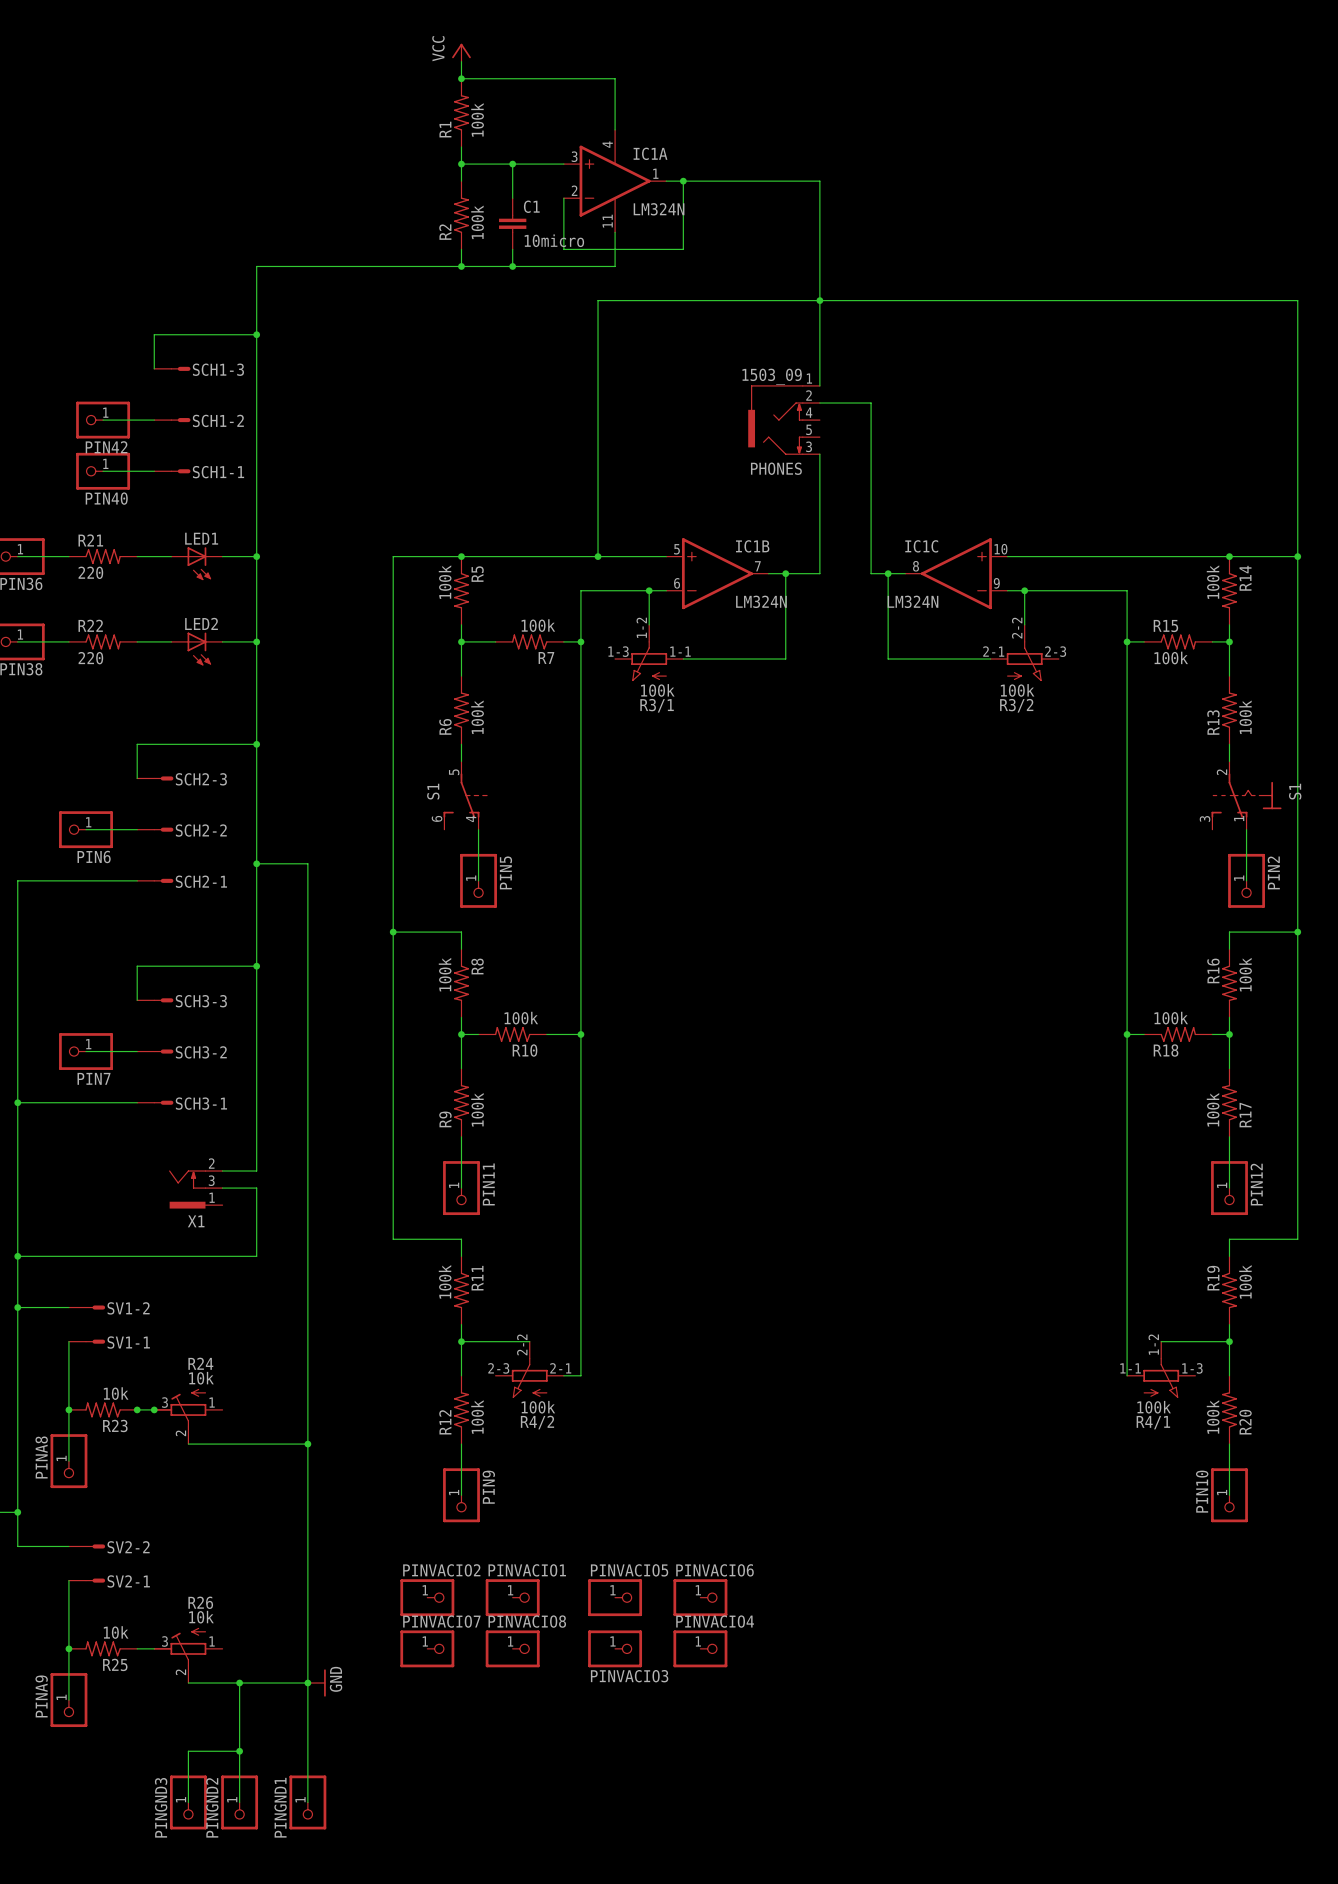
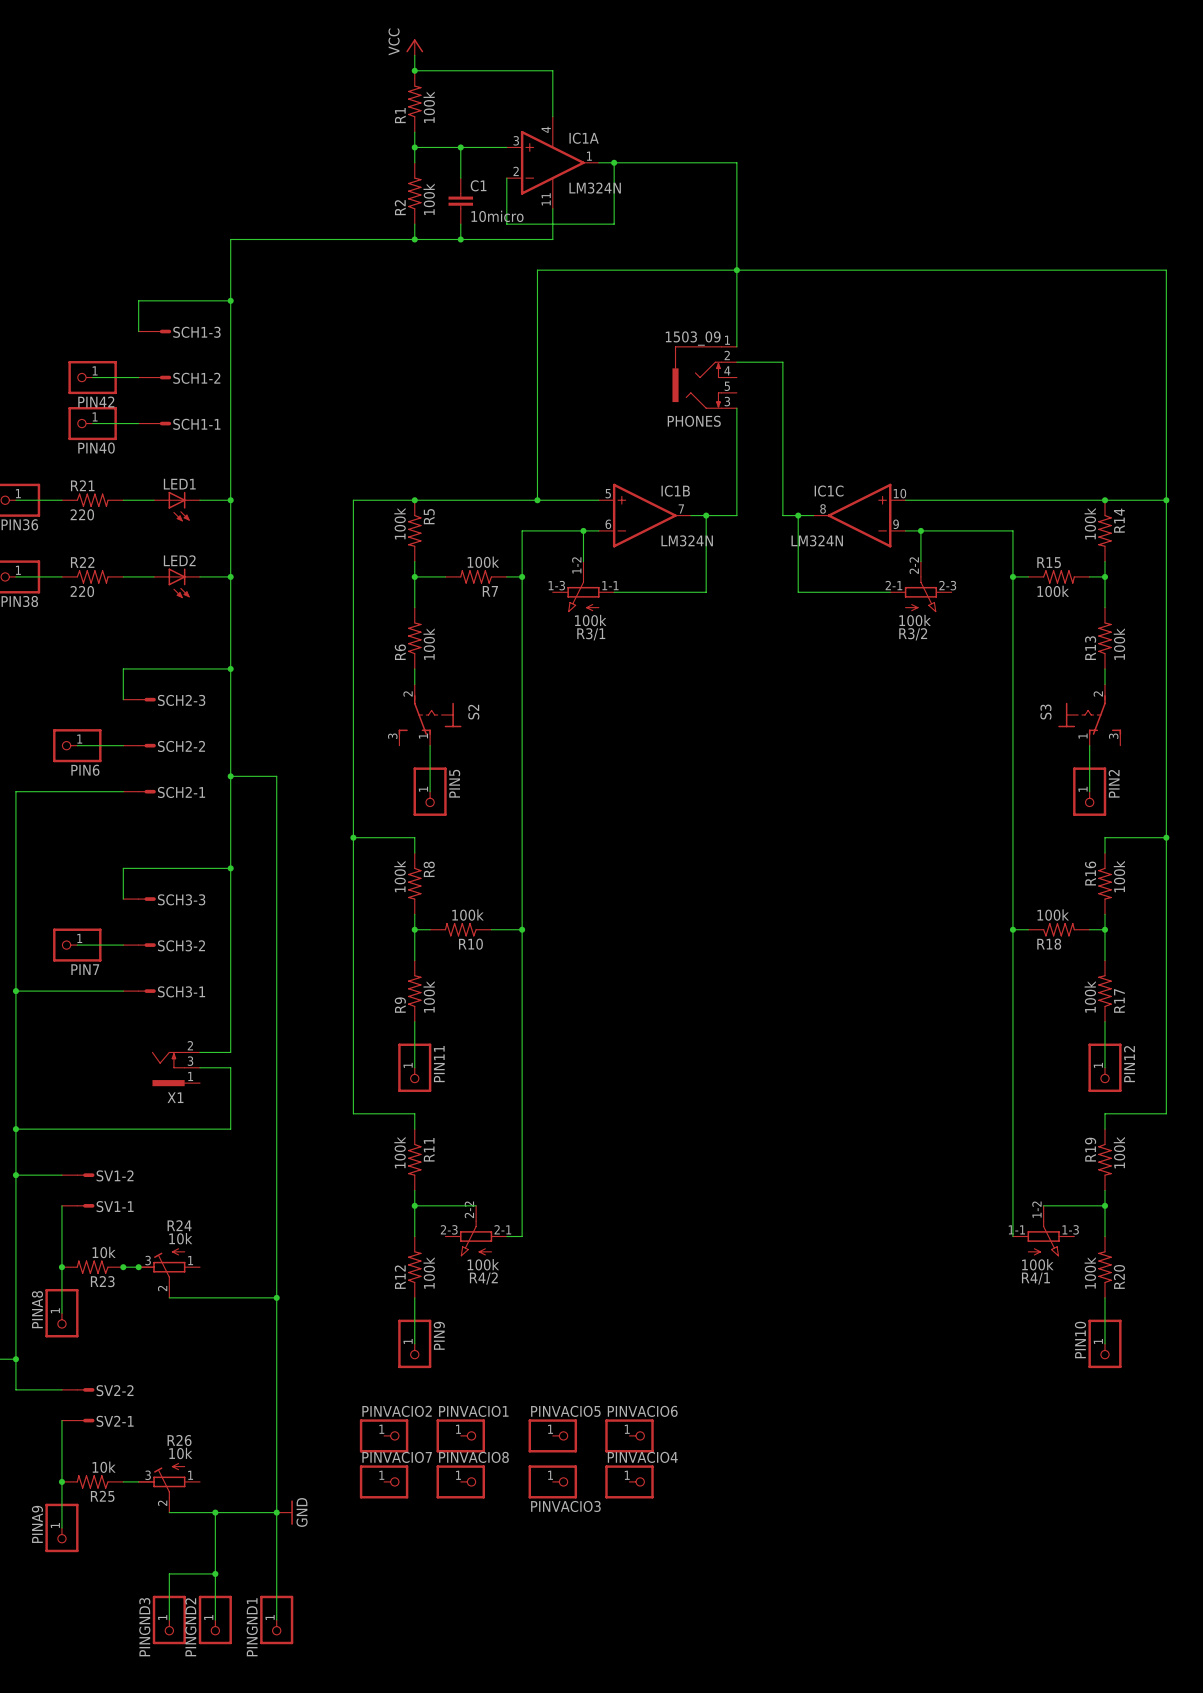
S1: (465, 795) -> none
S2: none -> (430, 714)
S3: none -> (1089, 714)
S1: (1246, 795) -> none
wire: (1246, 829) (1246, 880) -> (1089, 745) (1089, 791)
PIN2 position: (1246, 880) -> (1089, 791)

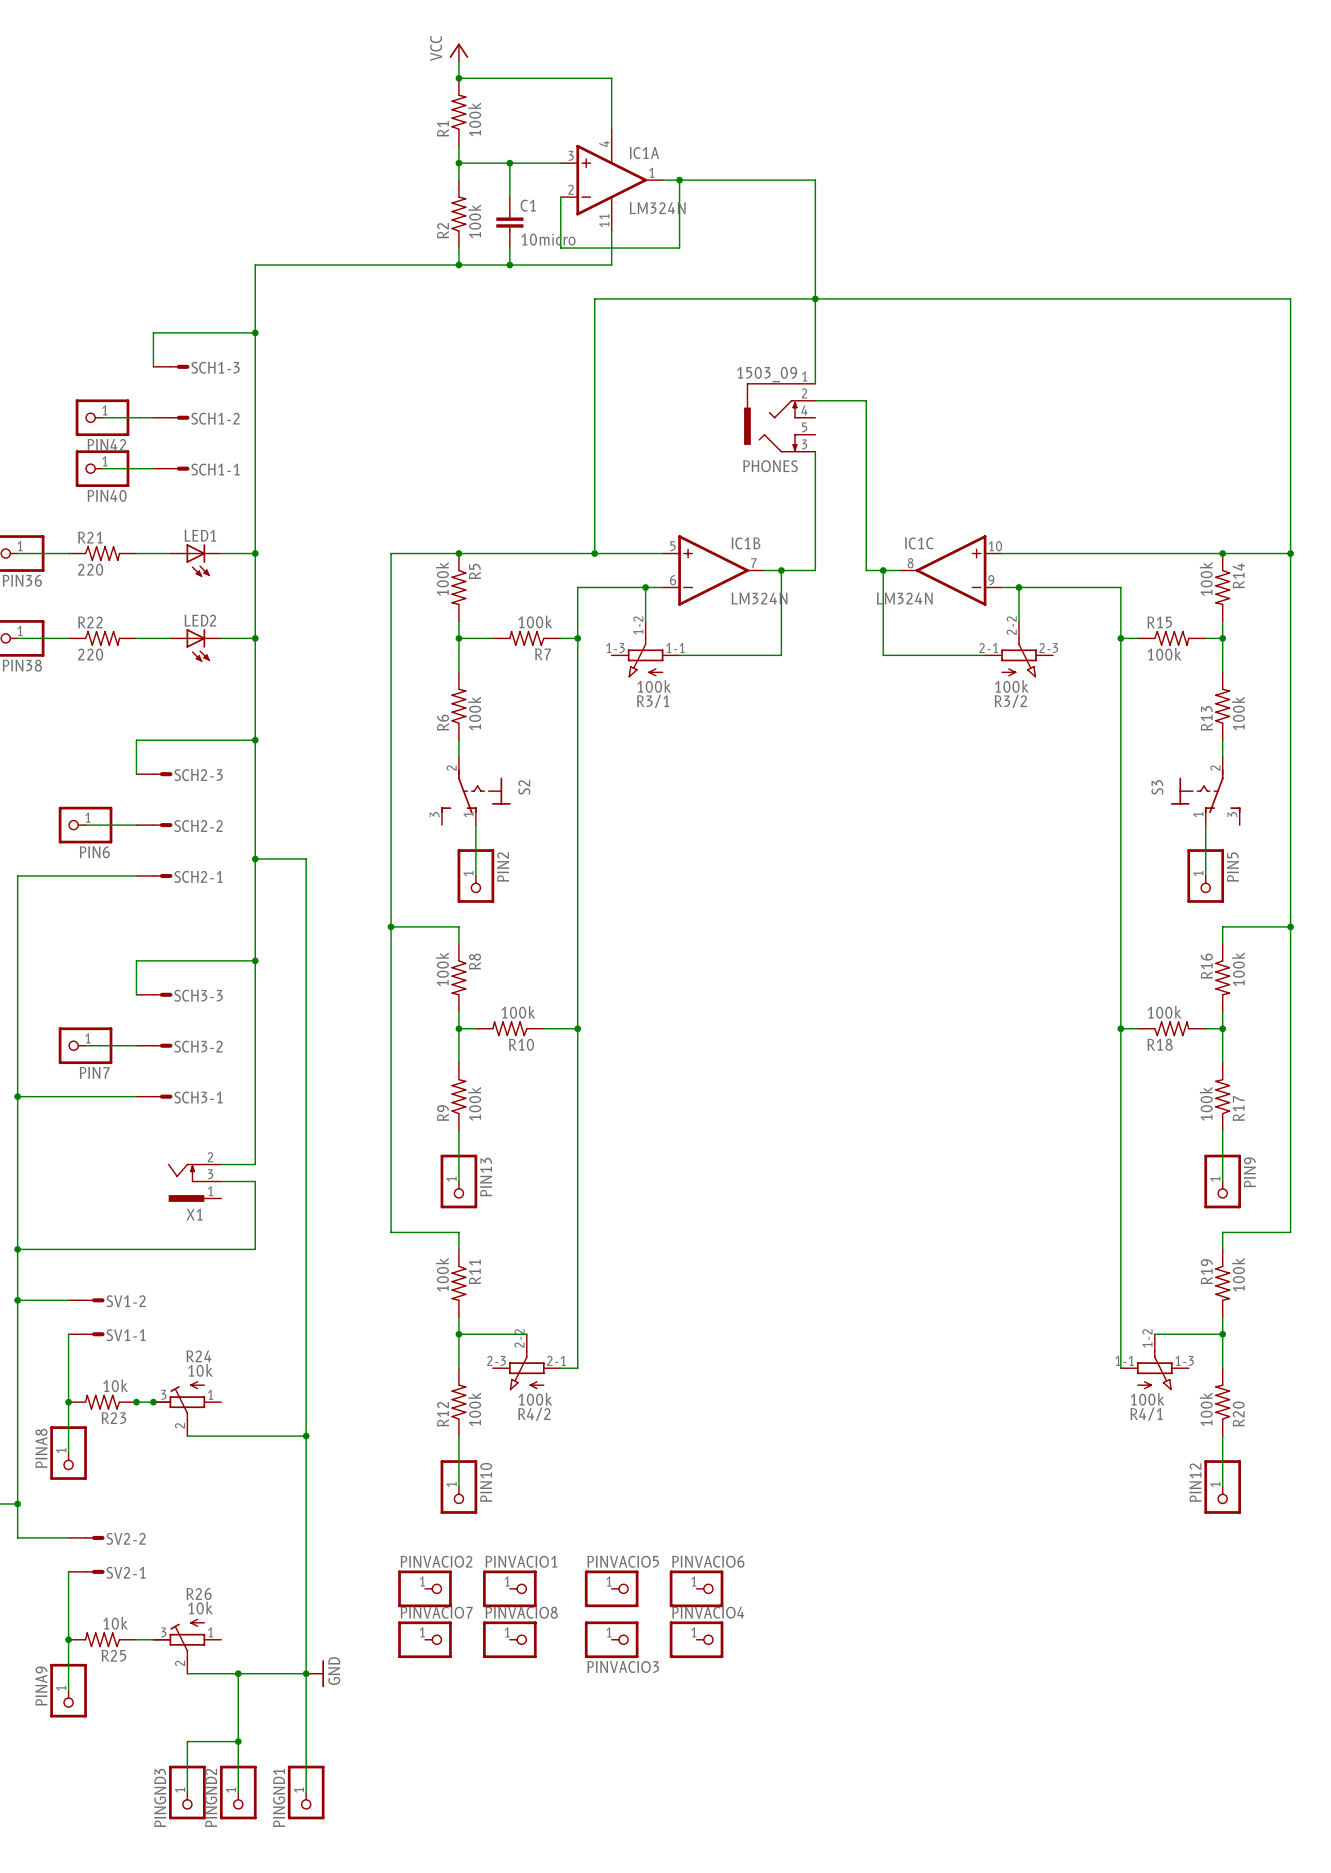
PIN5 name: PIN5 (454, 783) -> PIN2 (503, 867)
PIN2 name: PIN2 (1114, 783) -> PIN5 (1232, 867)
PIN11 name: PIN11 (439, 1064) -> PIN13 (486, 1177)
PIN12 name: PIN12 (1129, 1064) -> PIN9 (1249, 1172)
PIN9 name: PIN9 (439, 1335) -> PIN10 (486, 1482)
PIN10 name: PIN10 (1080, 1340) -> PIN12 (1195, 1482)

